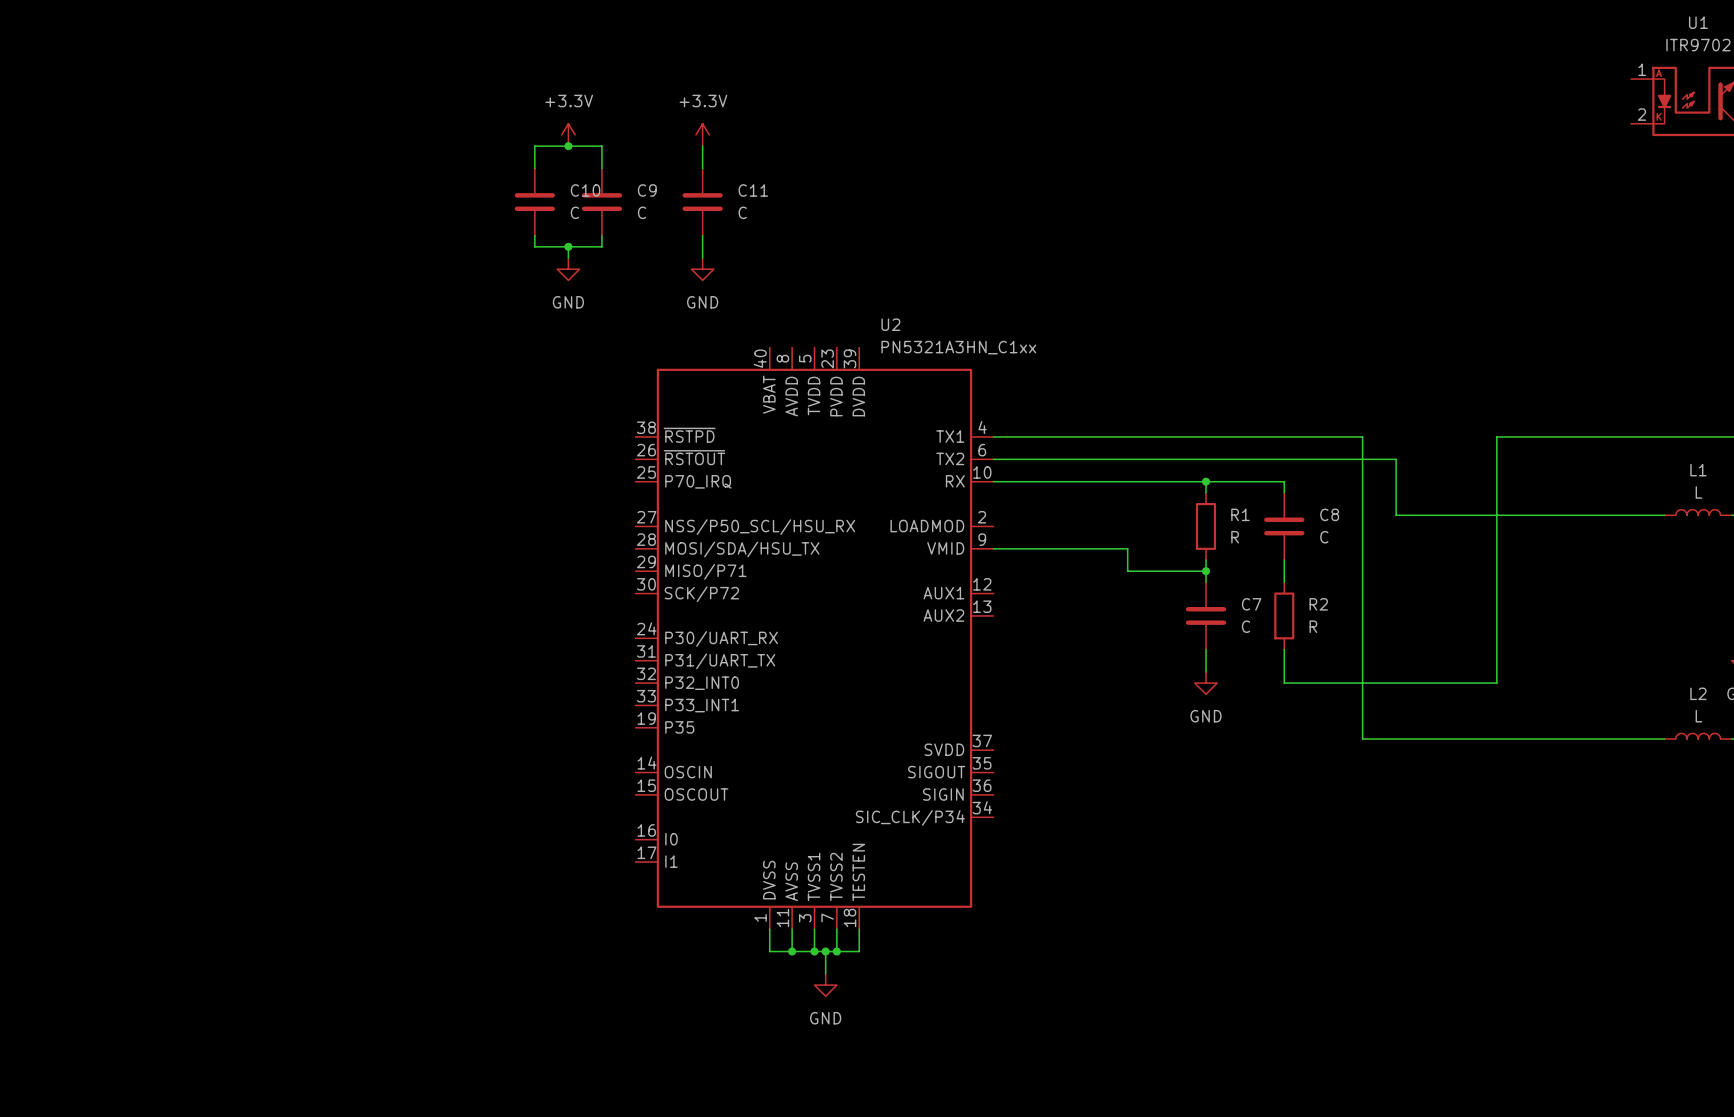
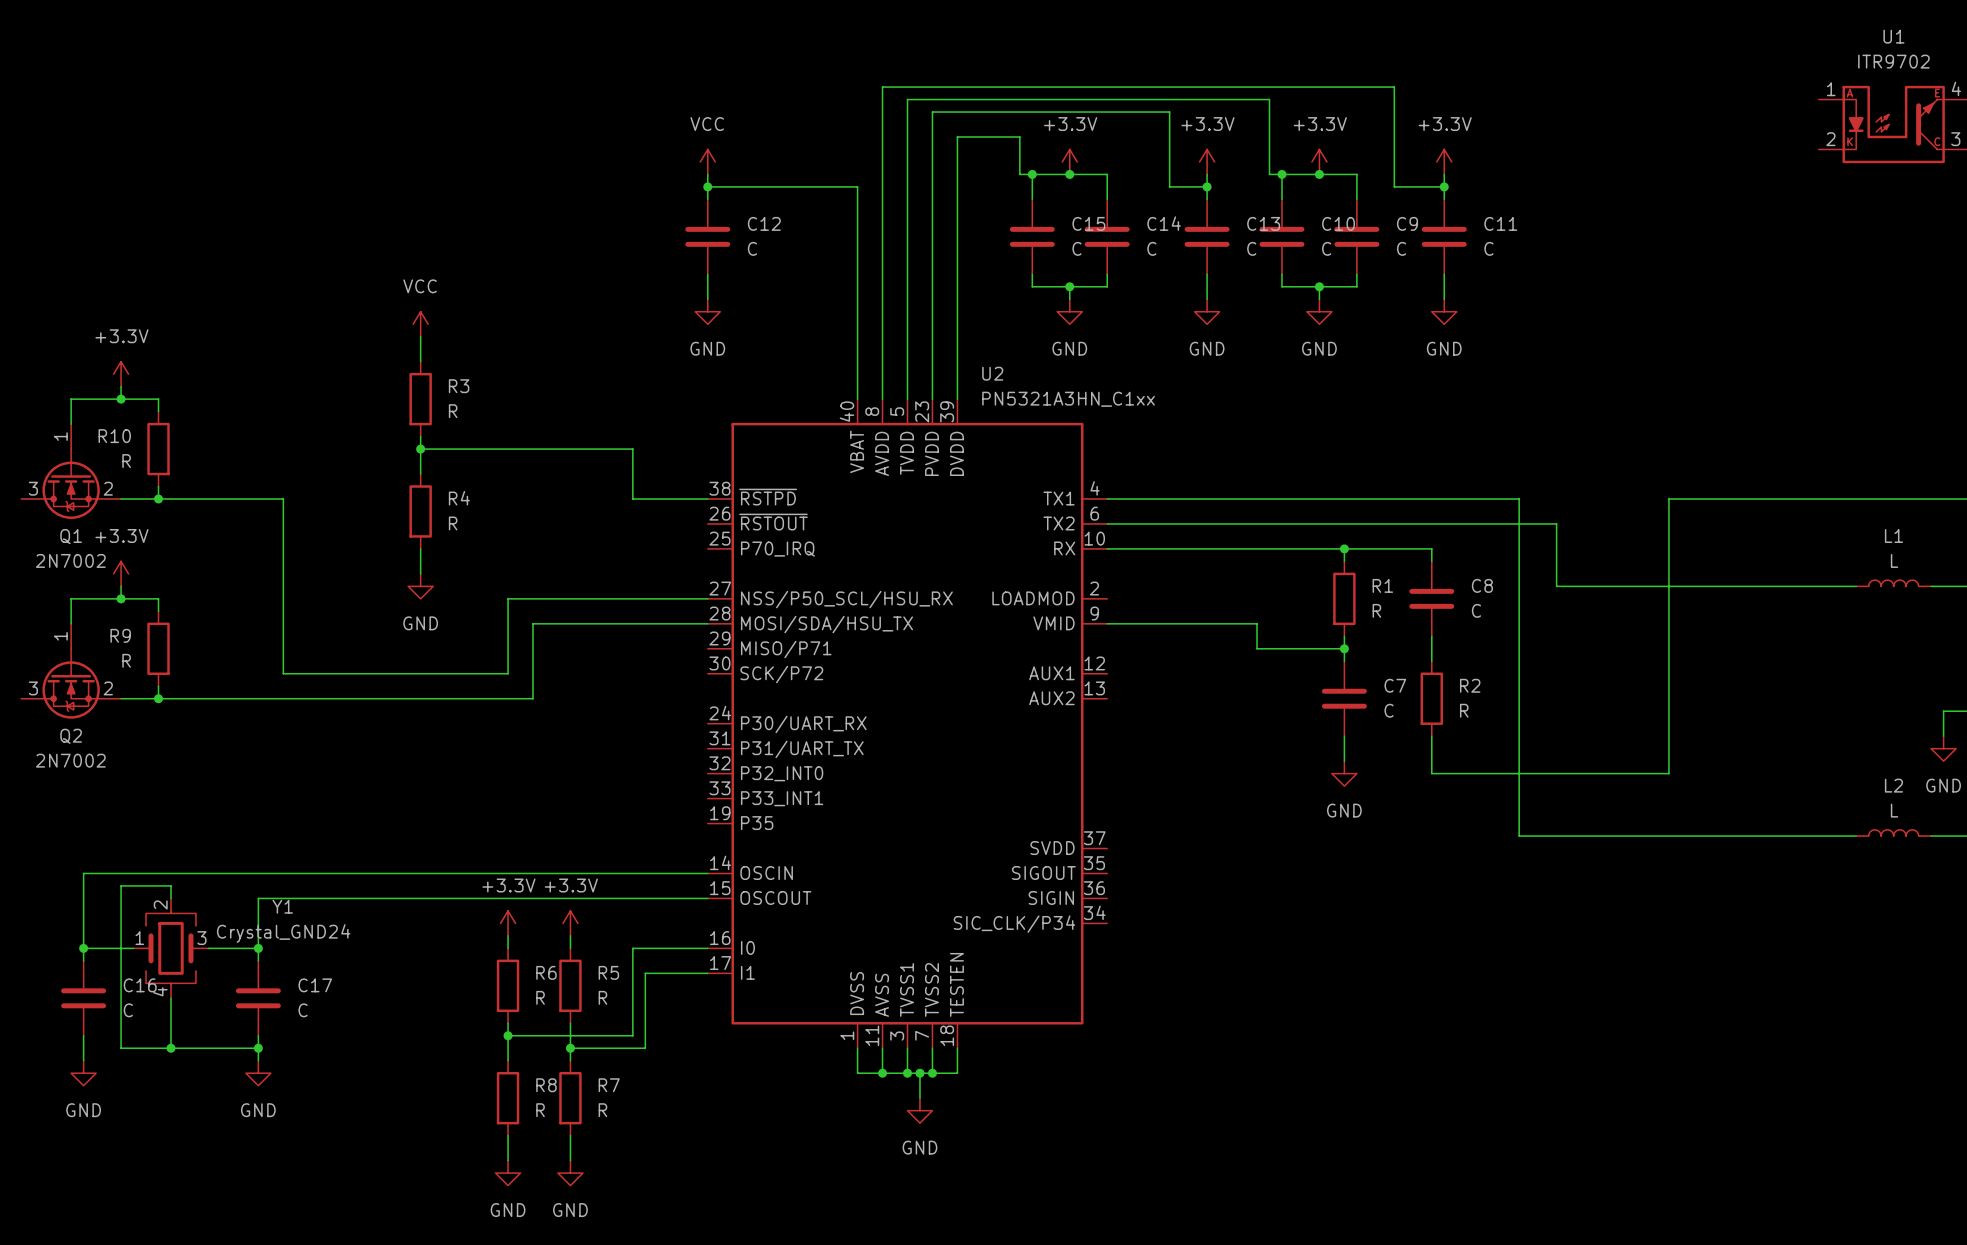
power symbol: +3.3V (568, 134) -> none
power symbol: none -> VCC (707, 161)
power symbol: +3.3V (702, 134) -> none
power symbol: none -> +3.3V (1069, 161)
power symbol: none -> +3.3V (1207, 161)
power symbol: none -> +3.3V (1319, 161)
power symbol: none -> +3.3V (1444, 161)
junction: (568, 146) -> none
wire: (702, 146) (702, 168) -> (707, 174) (707, 199)
wire: none -> (1032, 174) (1032, 199)
junction: none -> (1032, 174)
junction: none -> (1069, 174)
wire: none -> (1207, 174) (1207, 199)
wire: none -> (1281, 174) (1281, 199)
junction: none -> (1281, 174)
junction: none -> (1319, 174)
wire: none -> (1444, 174) (1444, 199)
wire: none -> (707, 186) (857, 186) (857, 399)
junction: none -> (707, 186)
wire: none -> (1207, 186) (1169, 186) (1169, 112) (932, 112) (932, 399)
junction: none -> (1207, 186)
wire: none -> (1444, 186) (1394, 186) (1394, 87) (882, 87) (882, 399)
junction: none -> (1444, 186)
wire: (534, 168) (534, 146) (601, 146) (601, 168) -> none
wire: none -> (1107, 199) (1107, 174) (1019, 174) (1019, 136) (957, 136) (957, 399)
wire: none -> (1356, 199) (1356, 174) (1269, 174) (1269, 99) (907, 99) (907, 399)
C10 position: (534, 202) -> (1281, 236)
C9 position: (601, 202) -> (1356, 236)
C12: none -> C (707, 236)
C11 position: (702, 202) -> (1444, 236)
C15: none -> C (1032, 236)
C14: none -> C (1107, 236)
C13: none -> C (1207, 236)
wire: (534, 235) (534, 246) (601, 246) (601, 235) -> none
wire: (702, 235) (702, 258) -> (707, 274) (707, 299)
wire: none -> (1032, 274) (1032, 286) (1107, 286) (1107, 274)
wire: none -> (1207, 274) (1207, 299)
wire: none -> (1281, 274) (1281, 286) (1356, 286) (1356, 274)
wire: none -> (1444, 274) (1444, 299)
wire: (568, 246) (568, 258) -> none
junction: (568, 246) -> none
wire: none -> (1069, 286) (1069, 299)
junction: none -> (1069, 286)
wire: none -> (1319, 286) (1319, 299)
junction: none -> (1319, 286)
power symbol: GND (568, 269) -> none
power symbol: none -> GND (707, 311)
power symbol: GND (702, 269) -> none
power symbol: none -> GND (1069, 311)
power symbol: none -> GND (1207, 311)
power symbol: none -> GND (1319, 311)
power symbol: none -> GND (1444, 311)
power symbol: none -> VCC (420, 324)
wire: none -> (420, 336) (420, 361)
power symbol: none -> +3.3V (121, 374)
wire: none -> (121, 386) (121, 399)
junction: none -> (121, 399)
R3: none -> R (420, 399)
wire: none -> (158, 411) (158, 399) (71, 399) (71, 424)
wire: none -> (420, 436) (420, 474)
R10: none -> R (158, 449)
wire: none -> (420, 449) (632, 449) (632, 498) (707, 498)
junction: none -> (420, 449)
Q1: none -> 2N7002 (71, 471)
wire: none -> (158, 486) (158, 498)
wire: none -> (121, 498) (283, 498) (283, 673) (508, 673) (508, 598) (707, 598)
junction: none -> (158, 498)
R4: none -> R (420, 511)
wire: none -> (420, 548) (420, 573)
power symbol: none -> +3.3V (121, 573)
wire: none -> (121, 586) (121, 598)
power symbol: none -> GND (420, 586)
junction: none -> (121, 598)
wire: none -> (158, 611) (158, 598) (71, 598) (71, 623)
wire: none -> (707, 623) (533, 623) (533, 698) (121, 698)
R9: none -> R (158, 648)
Q2: none -> 2N7002 (71, 671)
wire: none -> (158, 686) (158, 698)
junction: none -> (158, 698)
wire: none -> (707, 873) (83, 873) (83, 960)
wire: none -> (170, 898) (170, 885) (121, 885) (121, 1048) (258, 1048)
wire: none -> (707, 898) (258, 898) (258, 960)
power symbol: none -> +3.3V (508, 923)
power symbol: none -> +3.3V (570, 923)
wire: none -> (508, 935) (508, 948)
wire: none -> (570, 935) (570, 948)
wire: none -> (83, 948) (133, 948)
junction: none -> (83, 948)
Y1: none -> Crystal_GND24 (170, 948)
wire: none -> (208, 948) (258, 948)
junction: none -> (258, 948)
wire: none -> (707, 948) (632, 948) (632, 1035) (508, 1035)
wire: none -> (707, 973) (645, 973) (645, 1048) (570, 1048)
R6: none -> R (508, 985)
R5: none -> R (570, 985)
C16: none -> C (83, 998)
wire: none -> (170, 998) (170, 1048)
C17: none -> C (258, 998)
wire: none -> (508, 1023) (508, 1060)
wire: none -> (570, 1023) (570, 1060)
wire: none -> (83, 1035) (83, 1060)
wire: none -> (258, 1035) (258, 1060)
junction: none -> (508, 1035)
junction: none -> (170, 1048)
junction: none -> (258, 1048)
junction: none -> (570, 1048)
power symbol: none -> GND (83, 1073)
power symbol: none -> GND (258, 1073)
R8: none -> R (508, 1098)
R7: none -> R (570, 1098)
wire: none -> (508, 1135) (508, 1160)
wire: none -> (570, 1135) (570, 1160)
power symbol: none -> GND (508, 1173)
power symbol: none -> GND (570, 1173)

